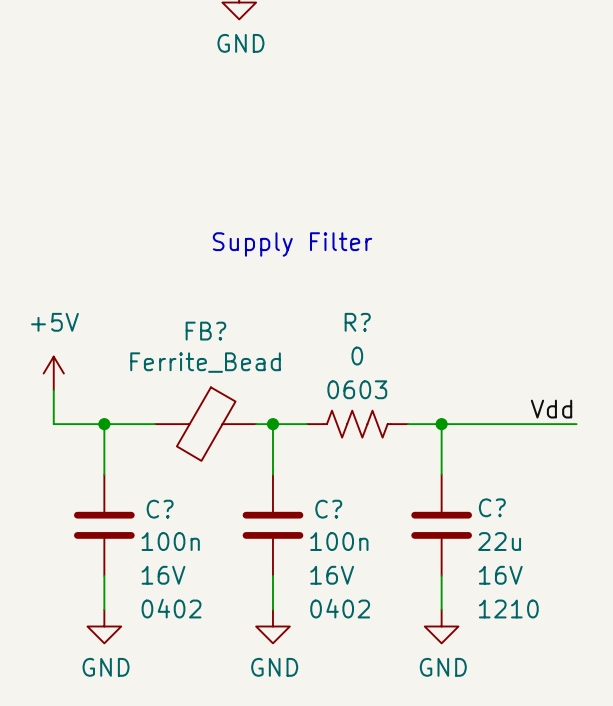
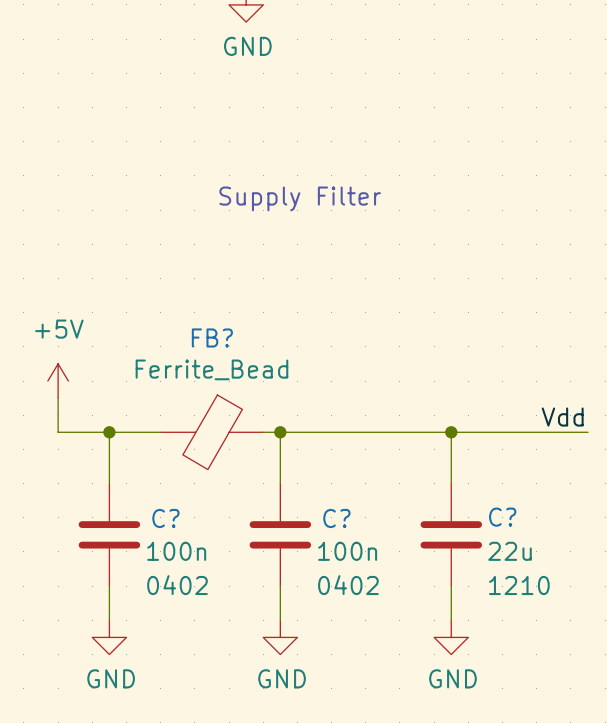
text position: Supply Filter (292, 244) -> Supply Filter (300, 198)
wire: none -> (314, 432) (417, 432)
R?: 0 (357, 424) -> none
C? text: 16V (163, 575) -> none
C? text: 16V (332, 575) -> none
C? text: 16V (500, 575) -> none
C? text position: 0402 (171, 608) -> 0402 (177, 585)
C? text position: 0402 (340, 608) -> 0402 (348, 585)
C? text position: 1210 (508, 609) -> 1210 (519, 585)

